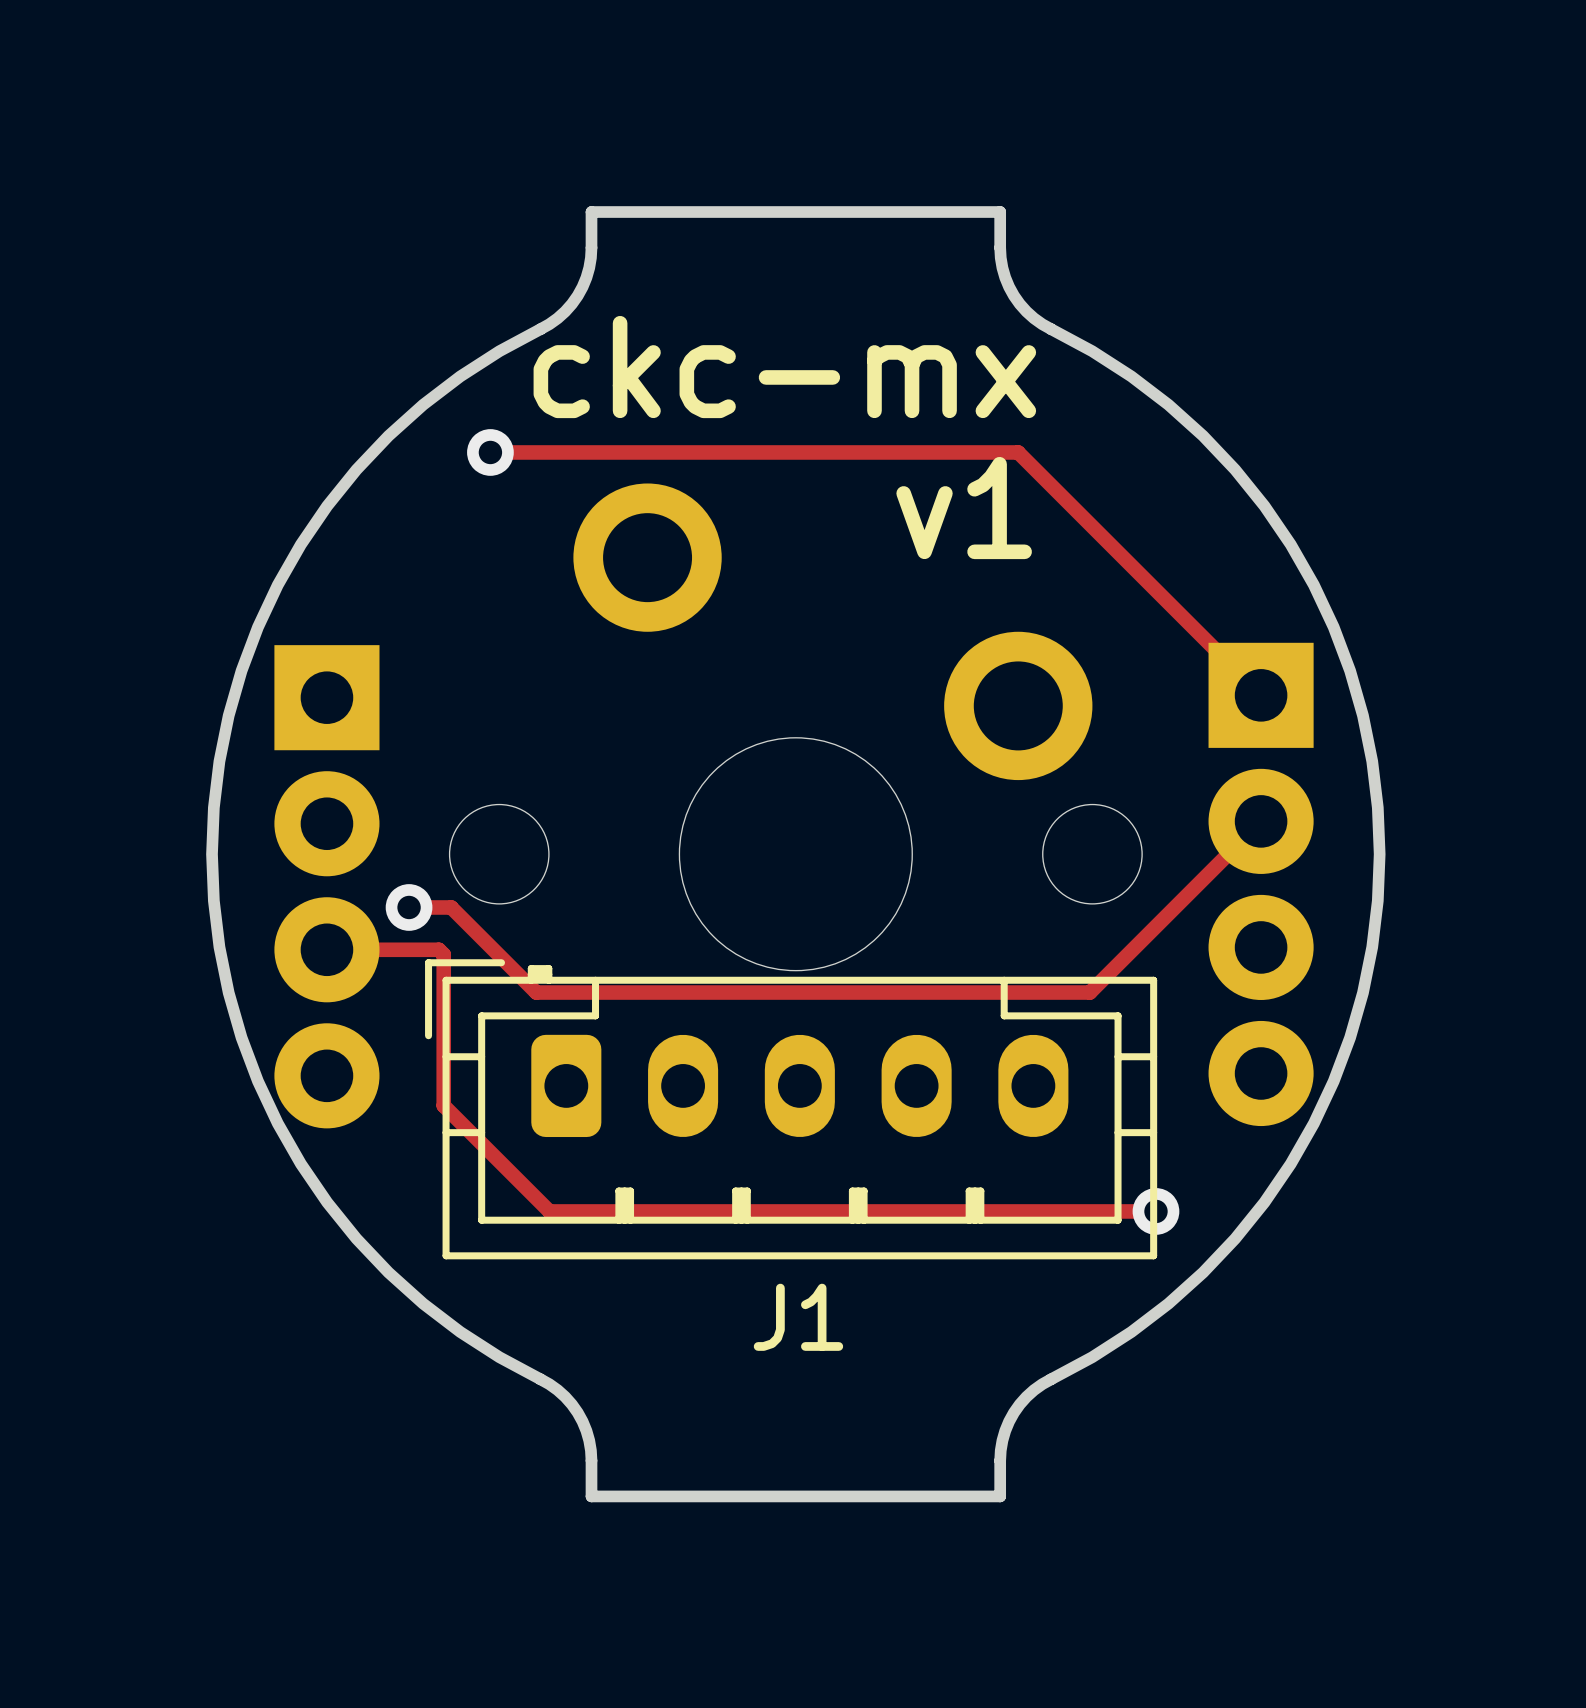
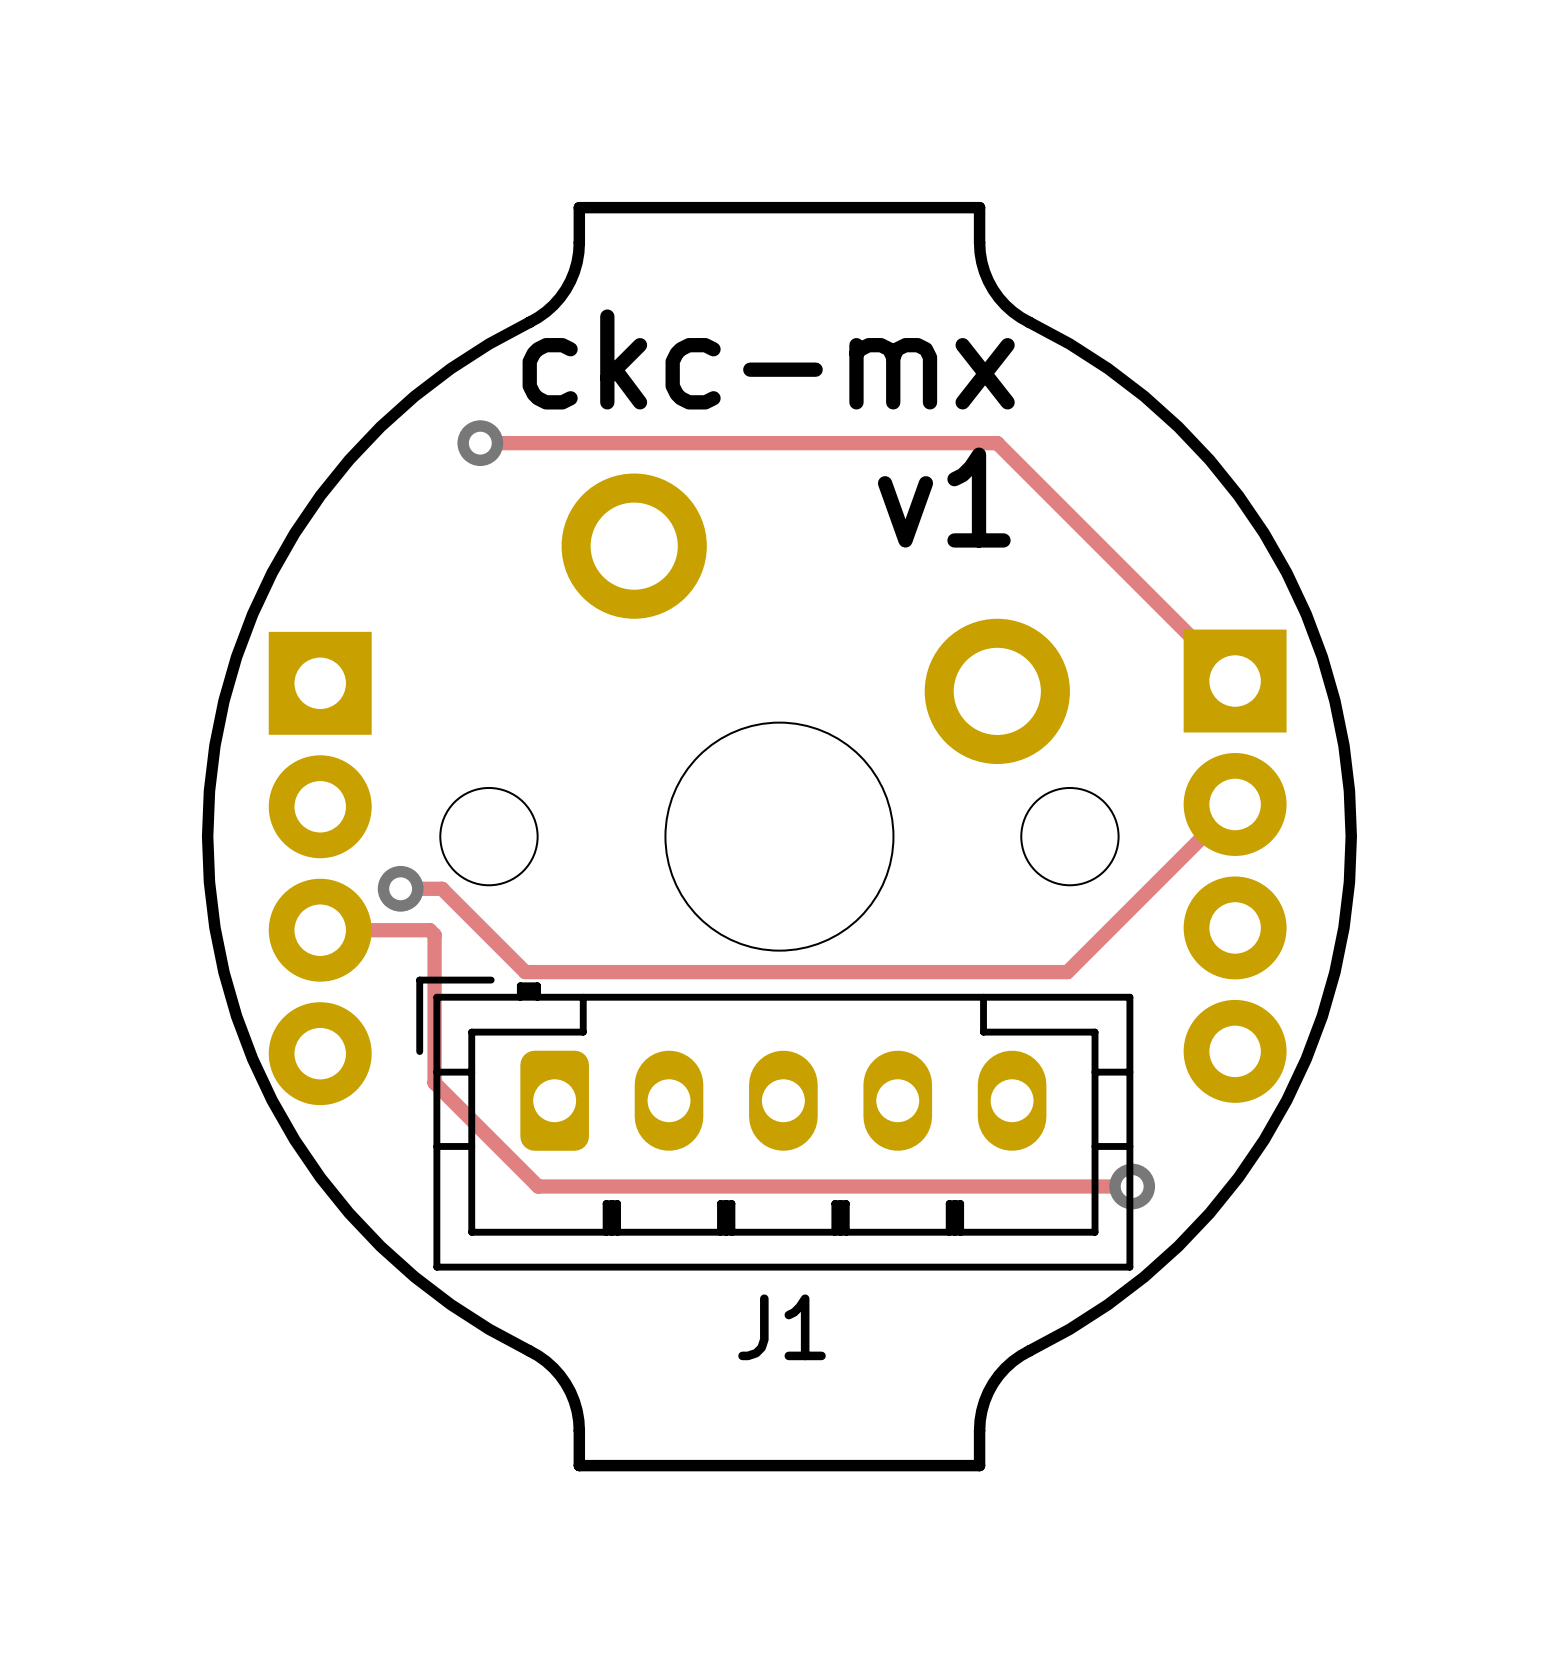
J1 position: (791, 1109) -> (774, 1123)

